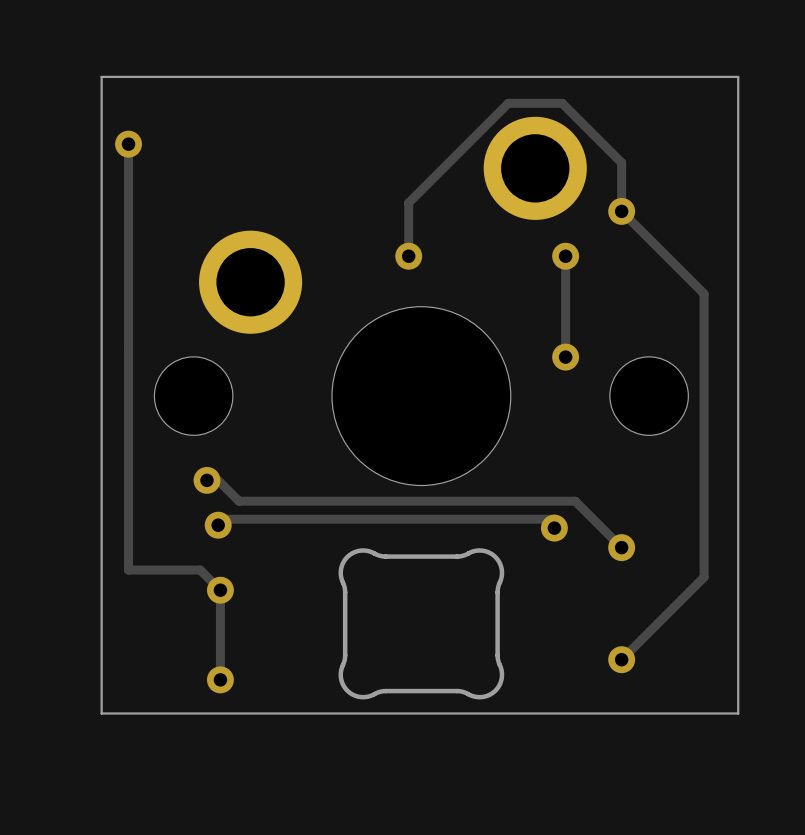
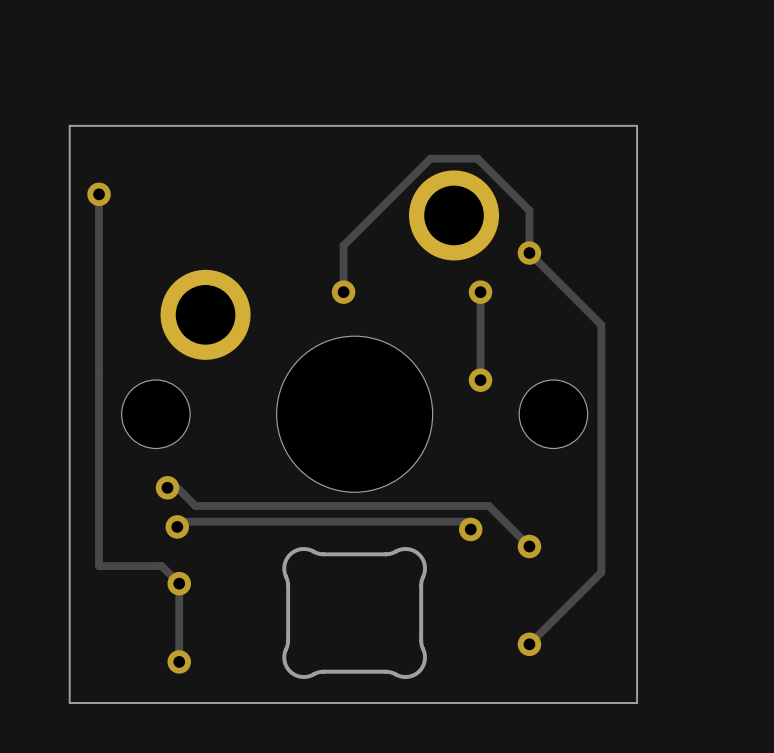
board edge: (101, 76) (738, 76) (738, 713) (101, 713) (101, 76) -> (69, 125) (69, 703) (637, 703) (637, 125) (69, 125)

